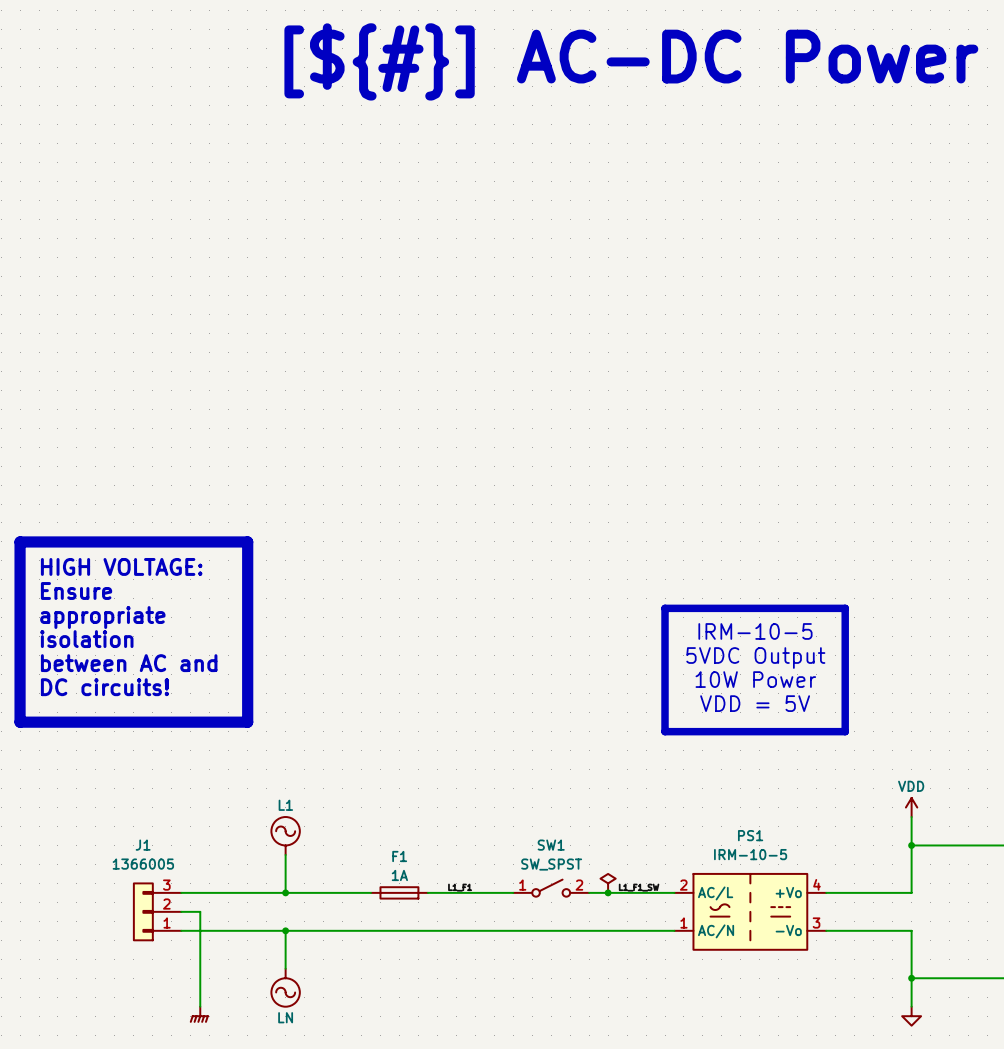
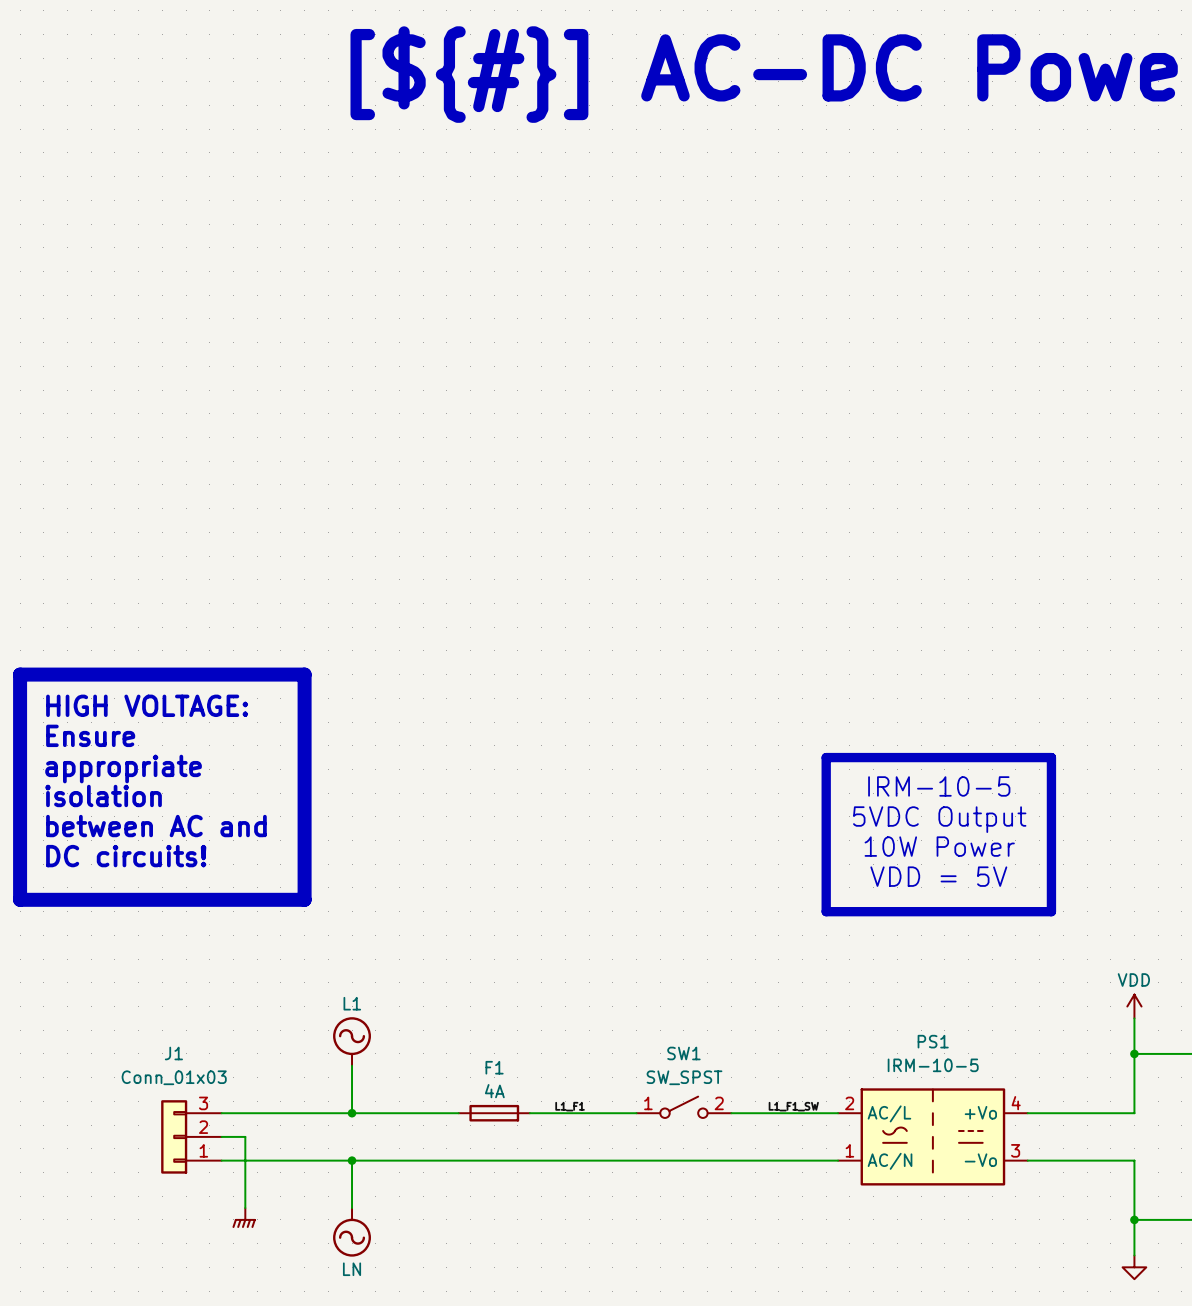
J1 value: 1366005 (143, 864) -> Conn_01x03 (174, 1077)
F1 value: 1A (399, 875) -> 4A (494, 1091)
power symbol: (608, 883) -> none
junction: (608, 892) -> none
wire: (200, 968) (200, 1006) -> none
power symbol position: (199, 1014) -> (244, 1218)

